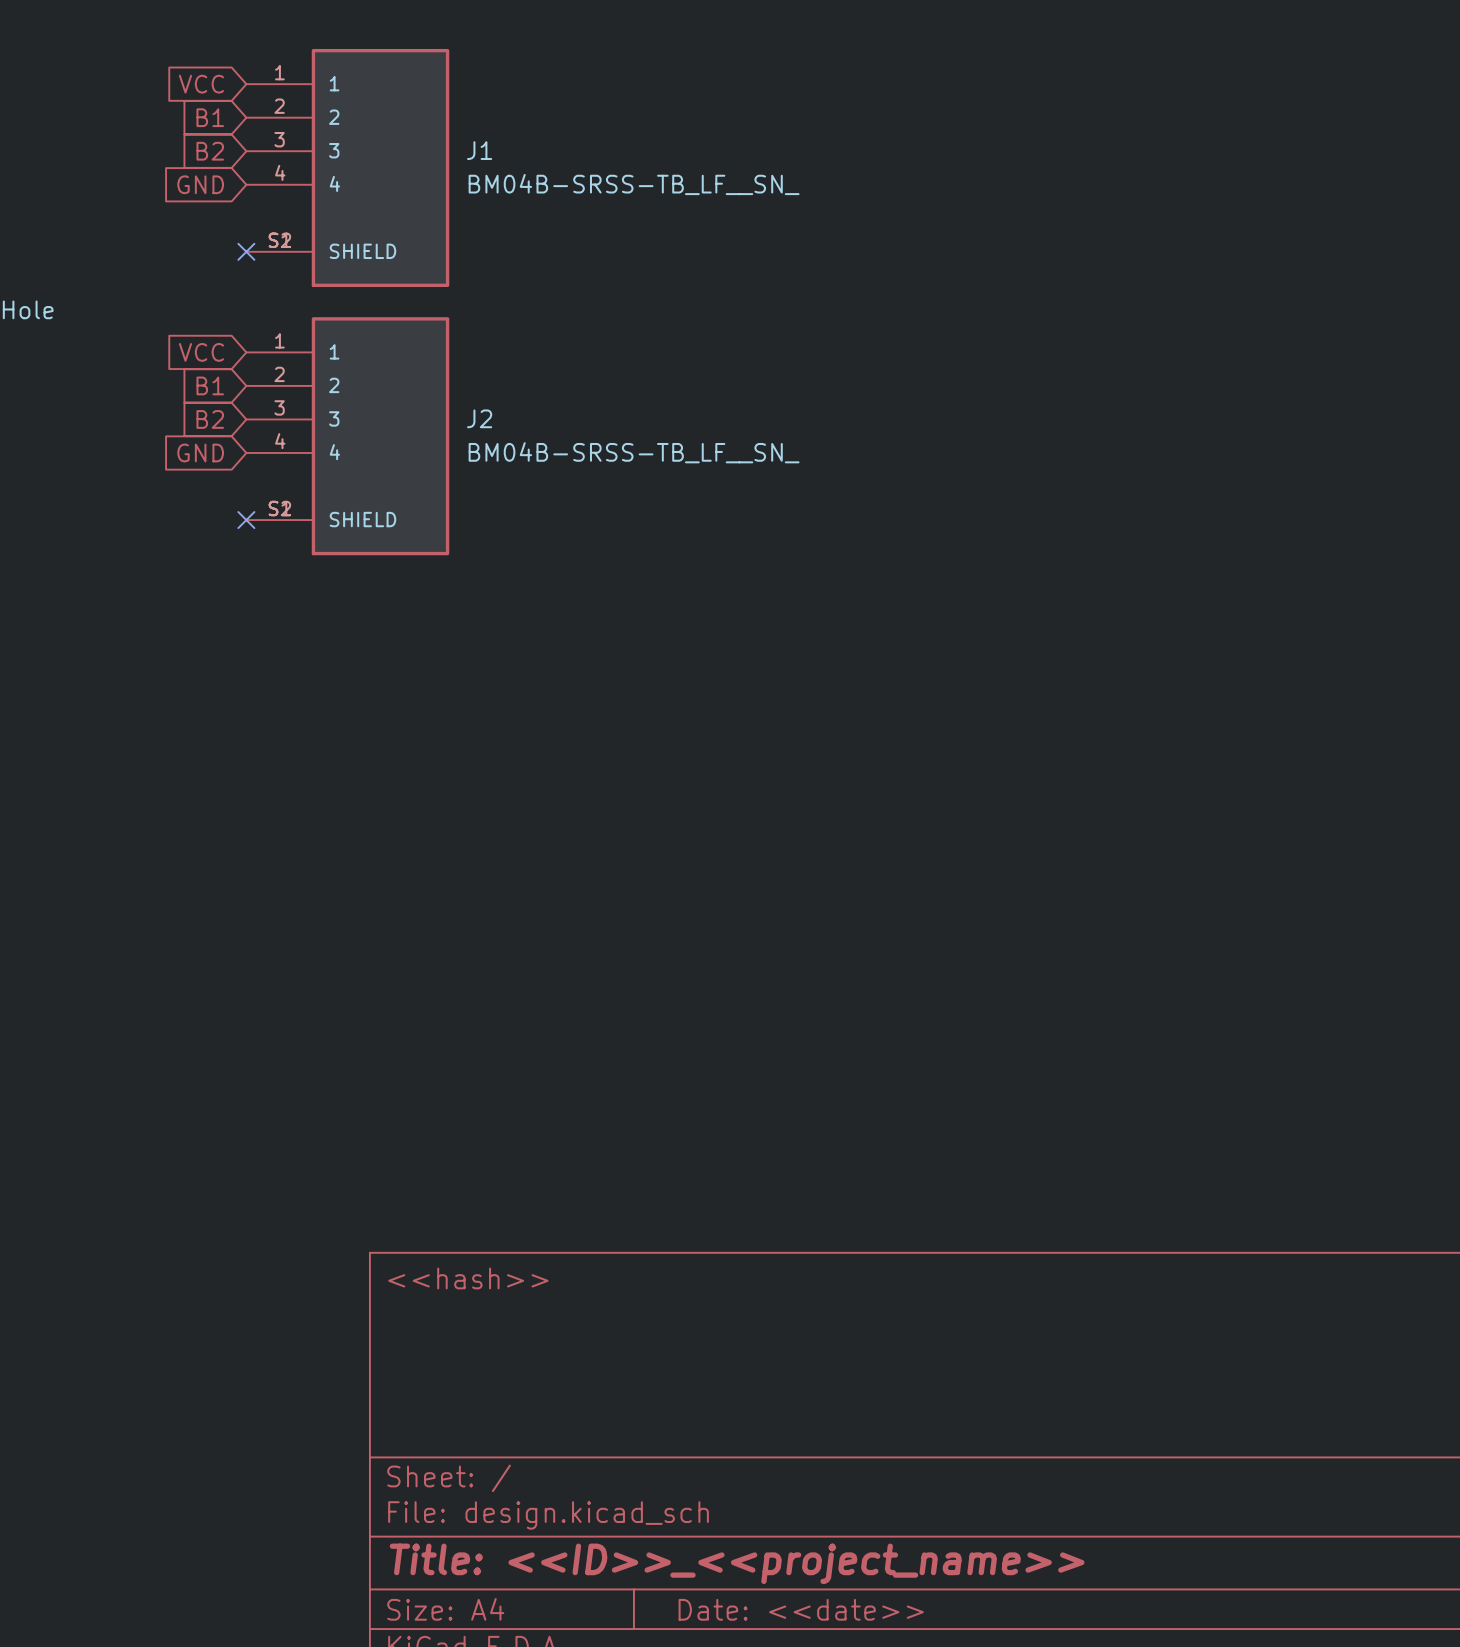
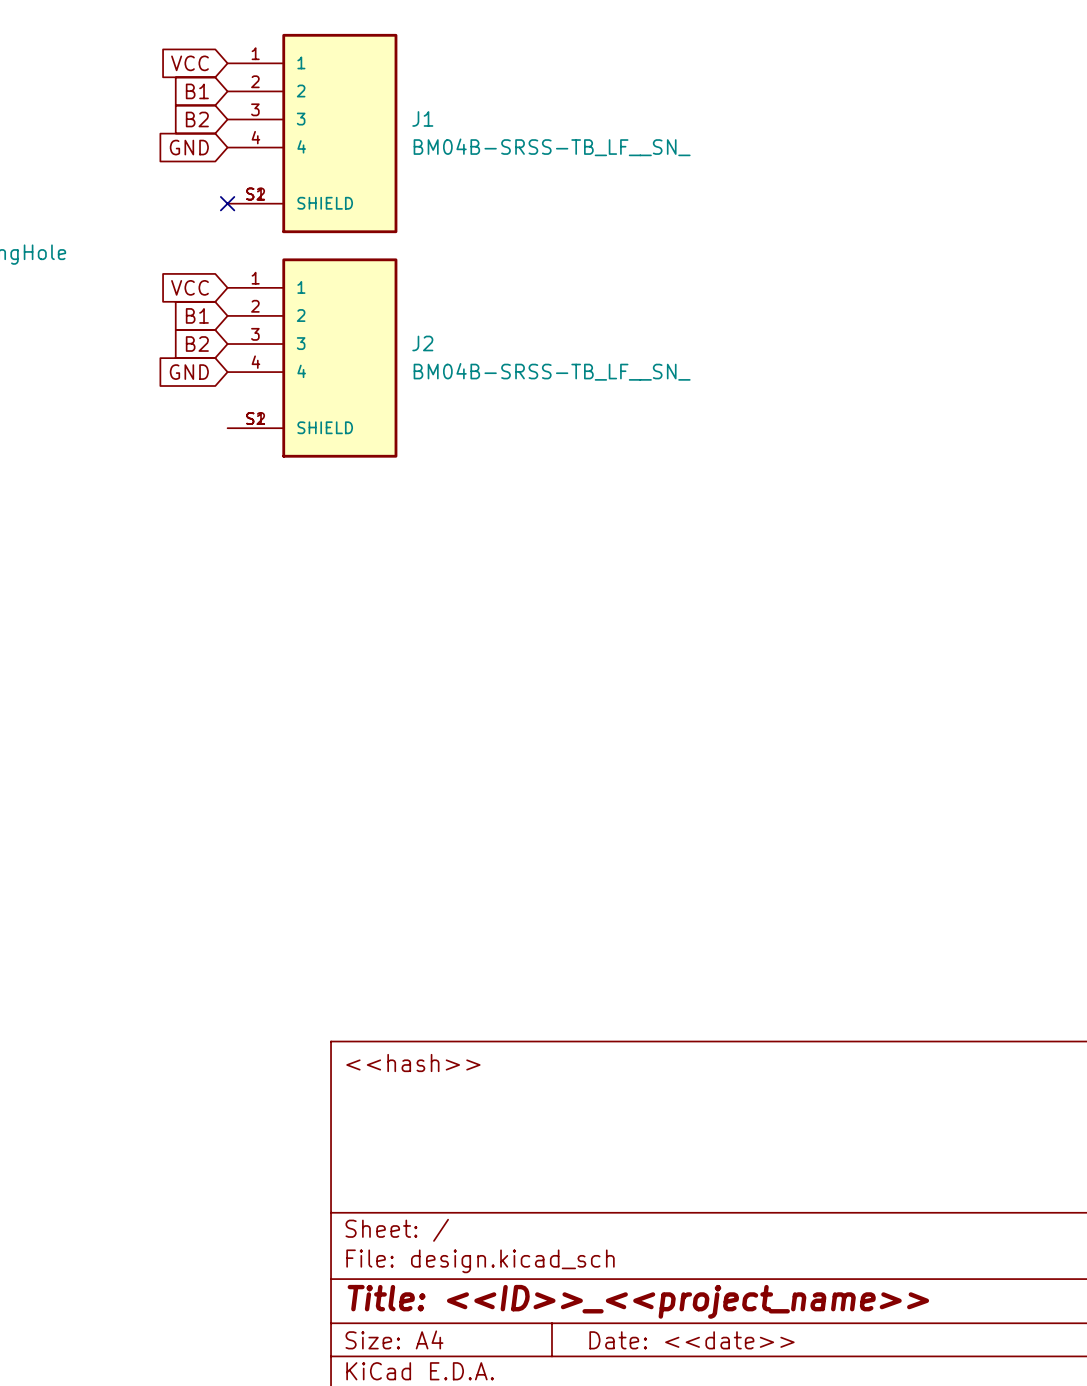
no-connect mark: (246, 520) -> none

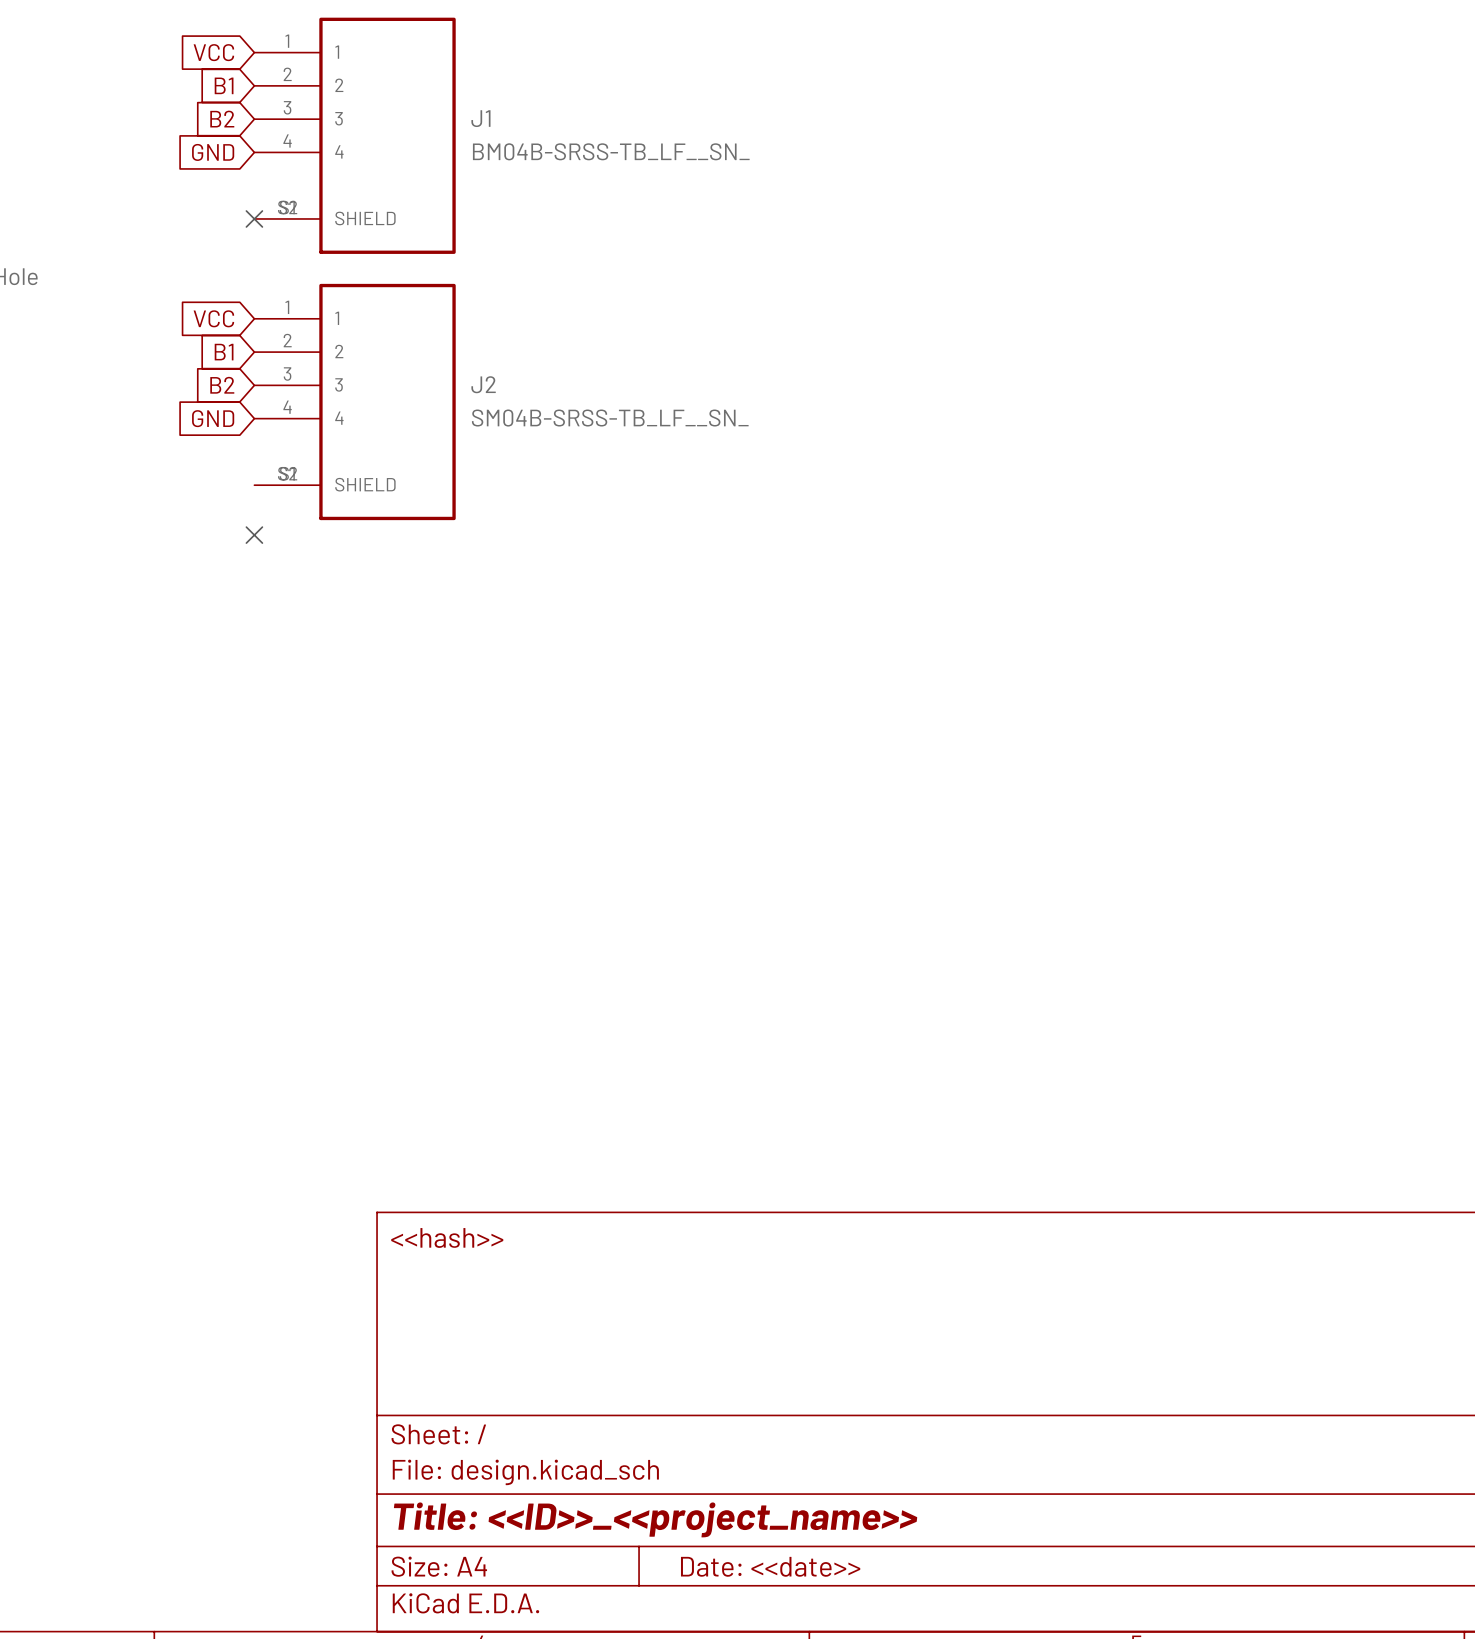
J2 value: BM04B-SRSS-TB_LF__SN_ (552, 371) -> SM04B-SRSS-TB_LF__SN_ (610, 418)
no-connect mark: none -> (254, 535)

